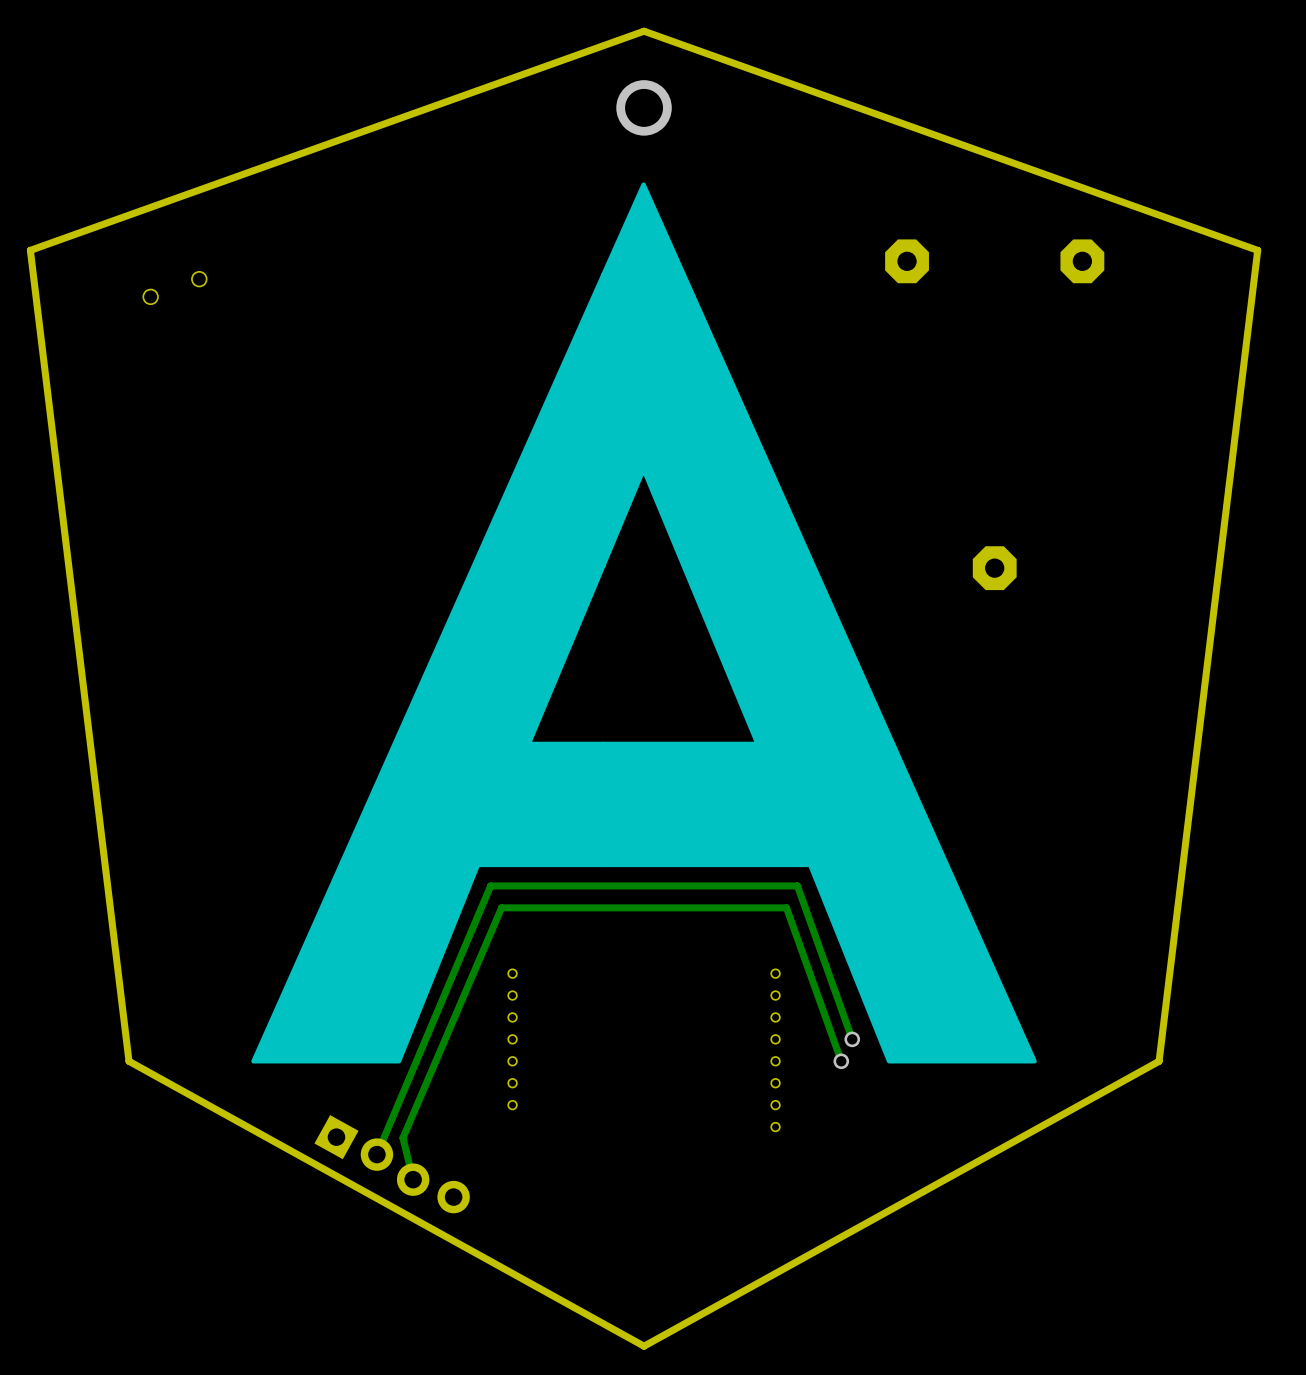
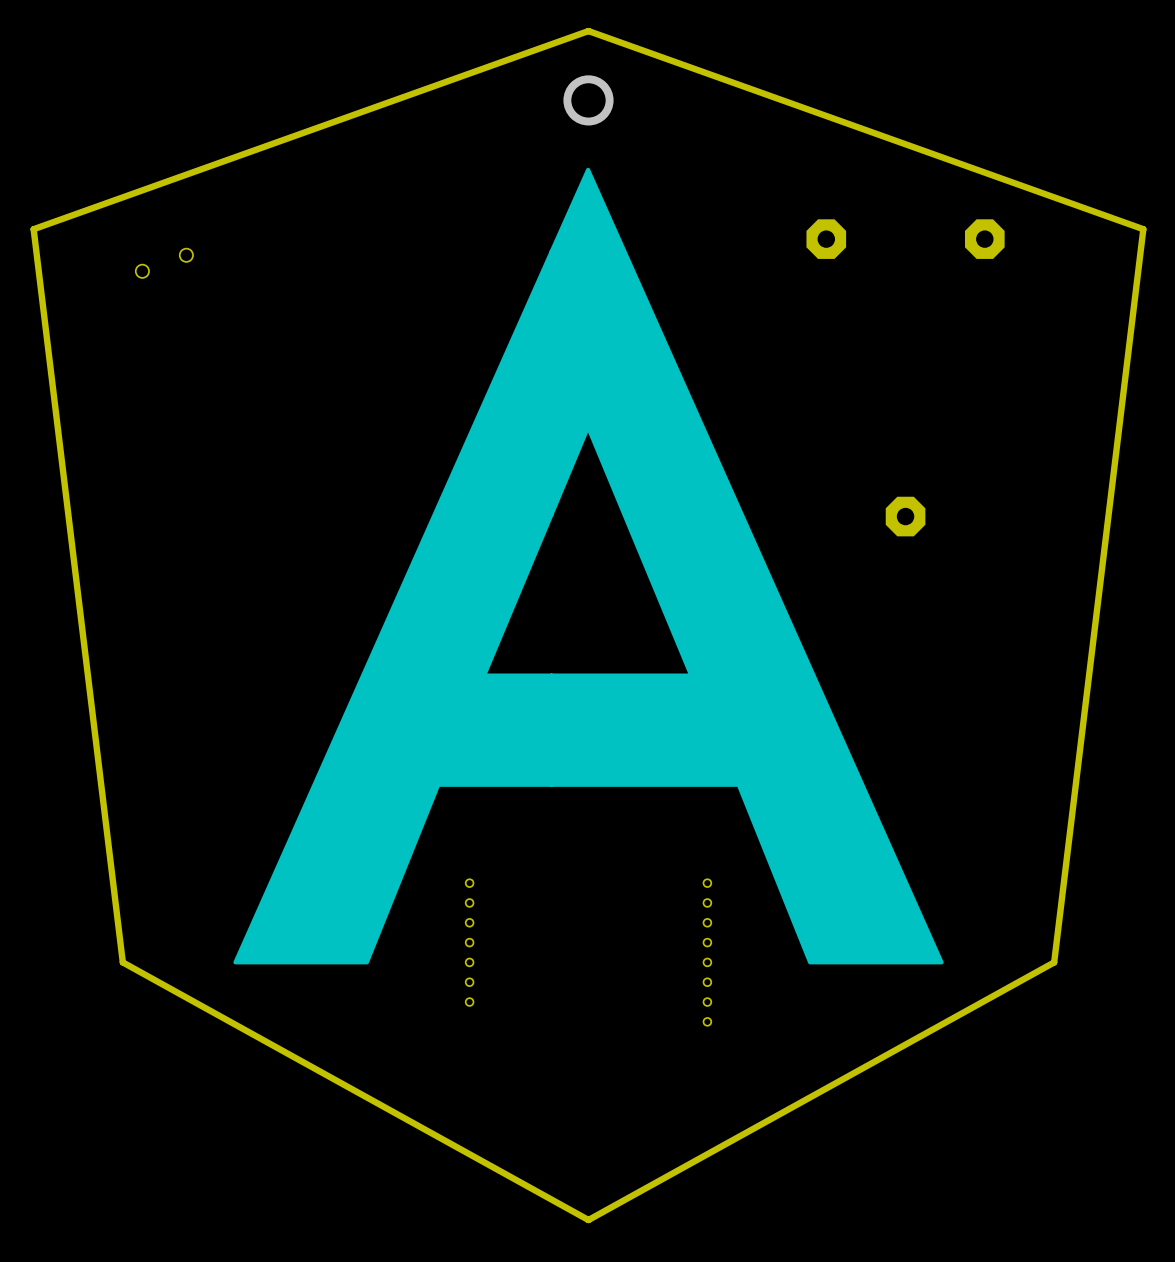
track: (852, 1039) (797, 885) (490, 885) (376, 1154) -> none
via: (852, 1039) -> none
track: (841, 1061) (786, 907) (501, 907) (402, 1137) (413, 1179) -> none
via: (841, 1061) -> none
part: (392, 1164) -> none

